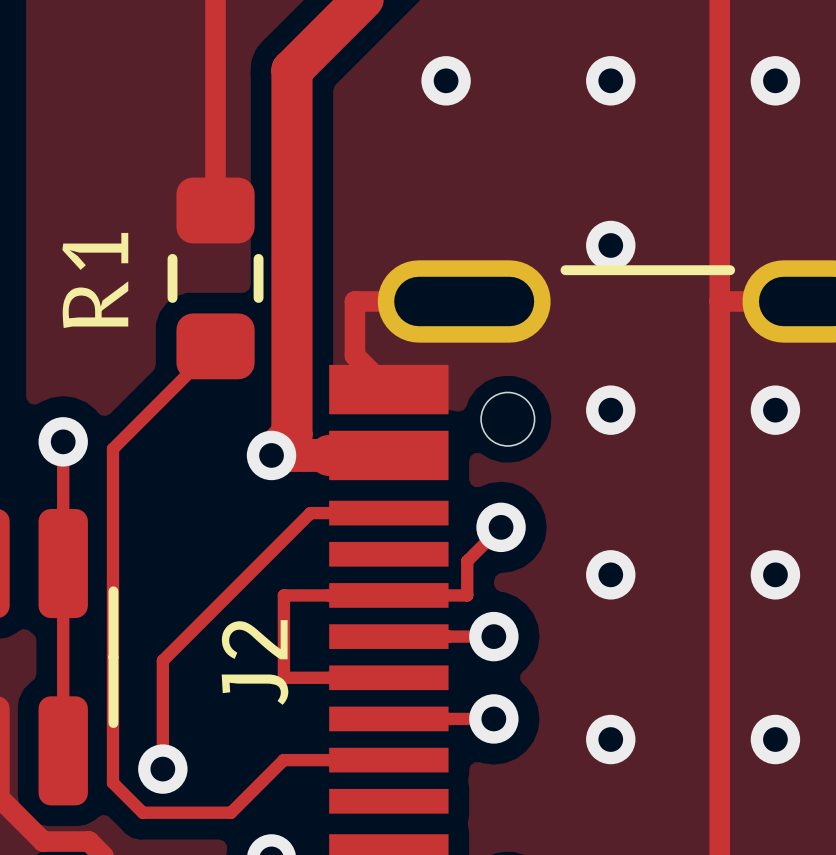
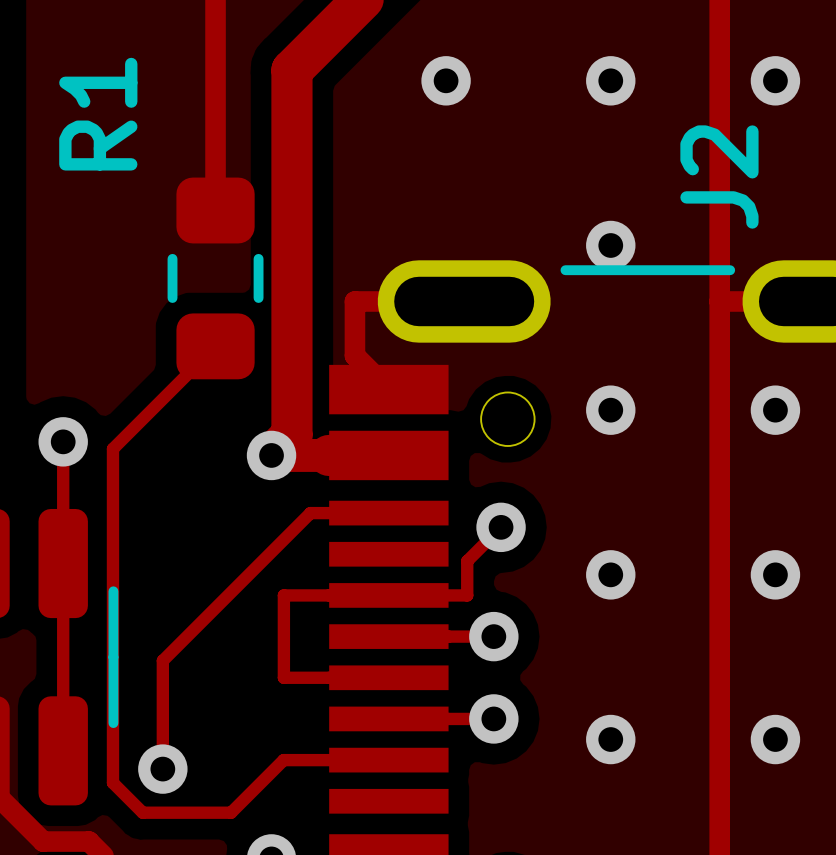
R1 name position: R1 (95, 280) -> R1 (98, 114)
J2 name position: J2 (255, 662) -> J2 (719, 177)

